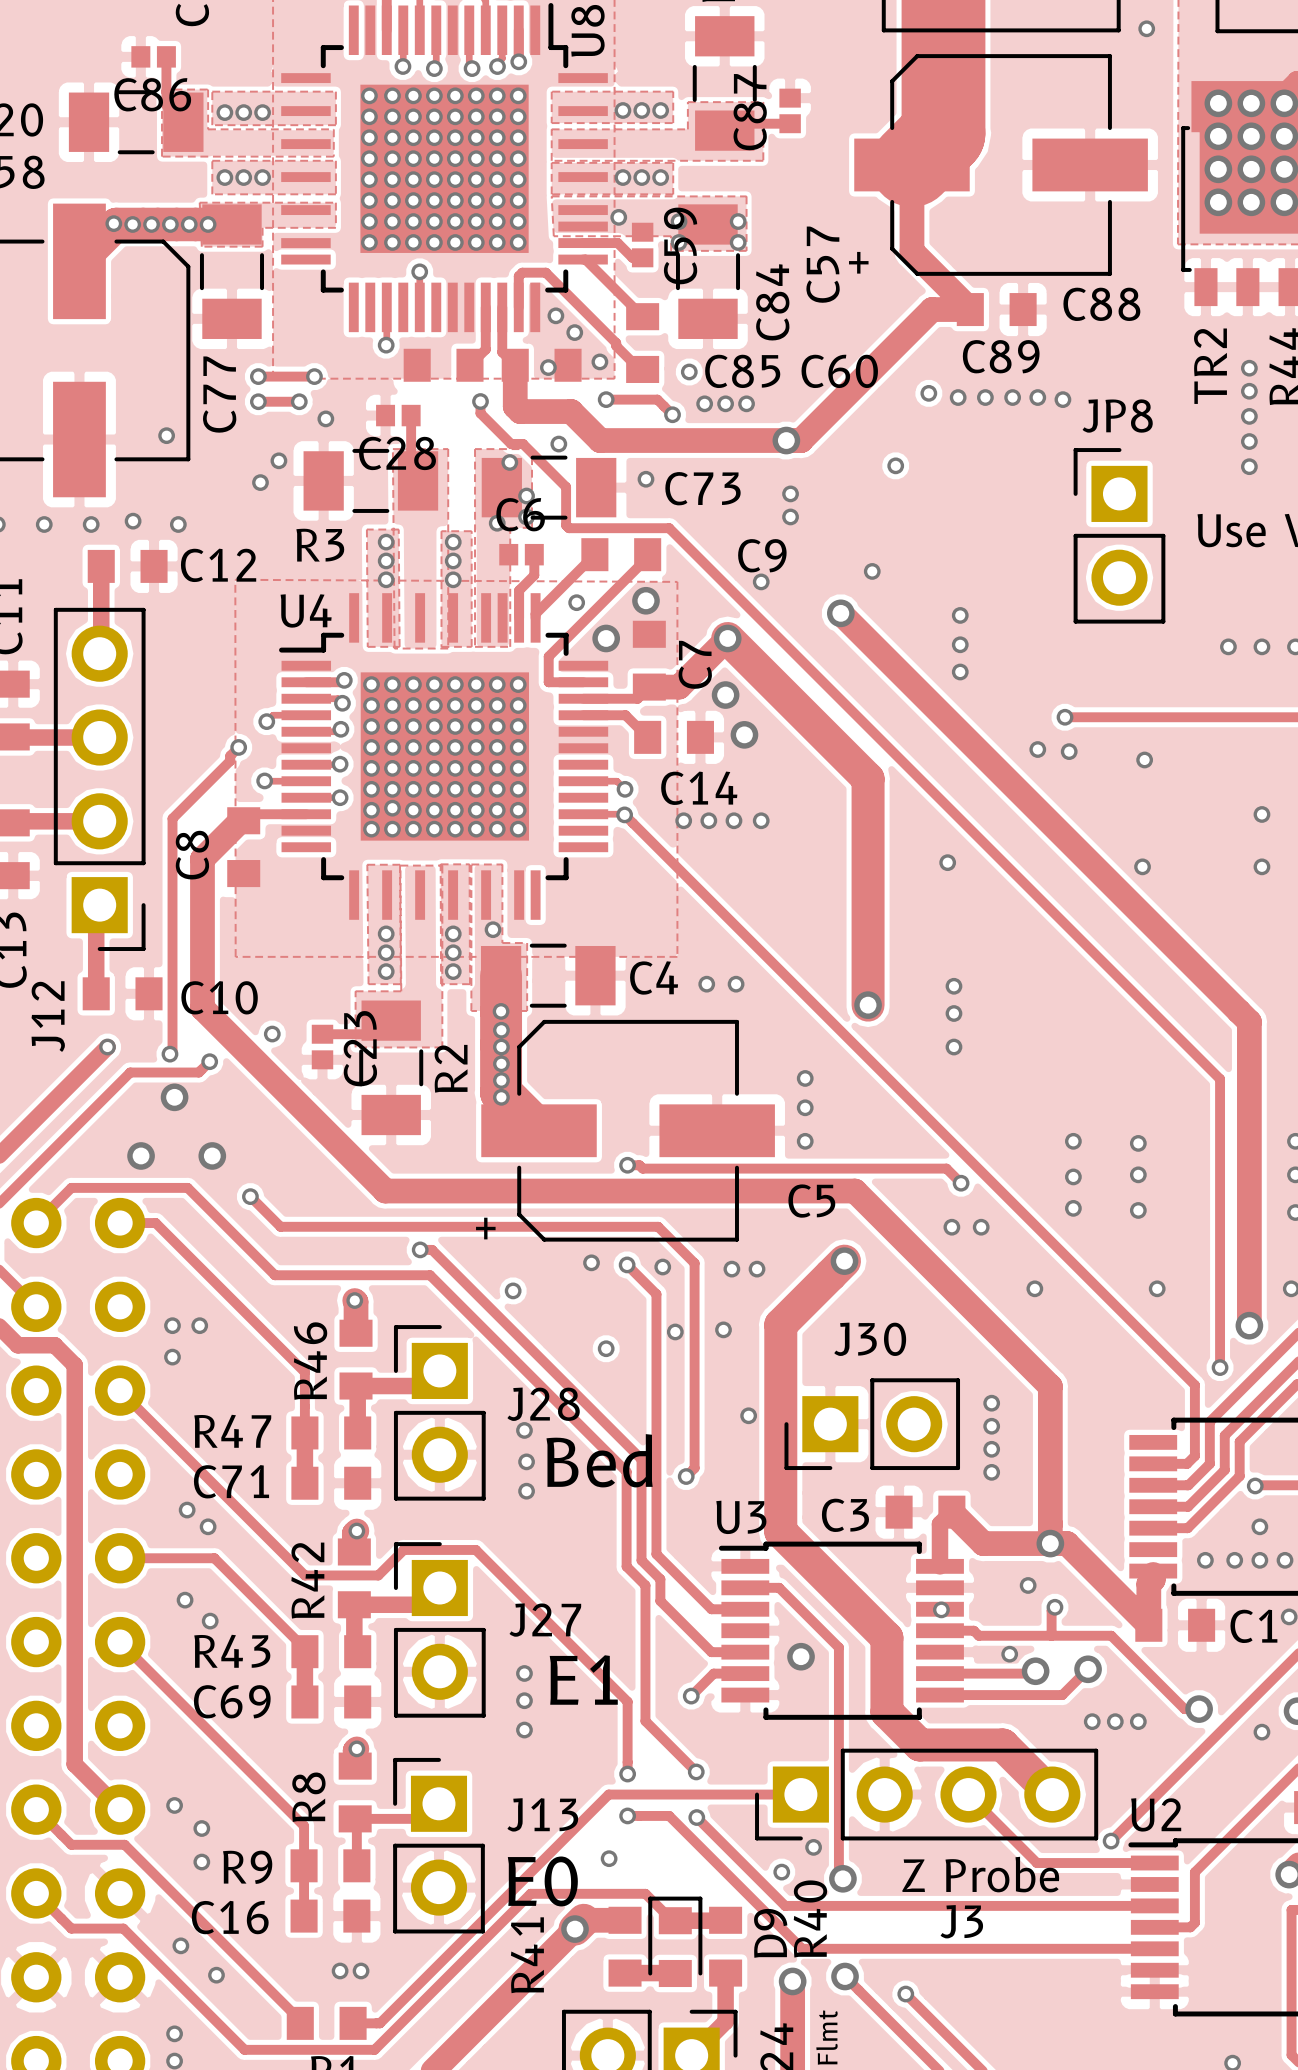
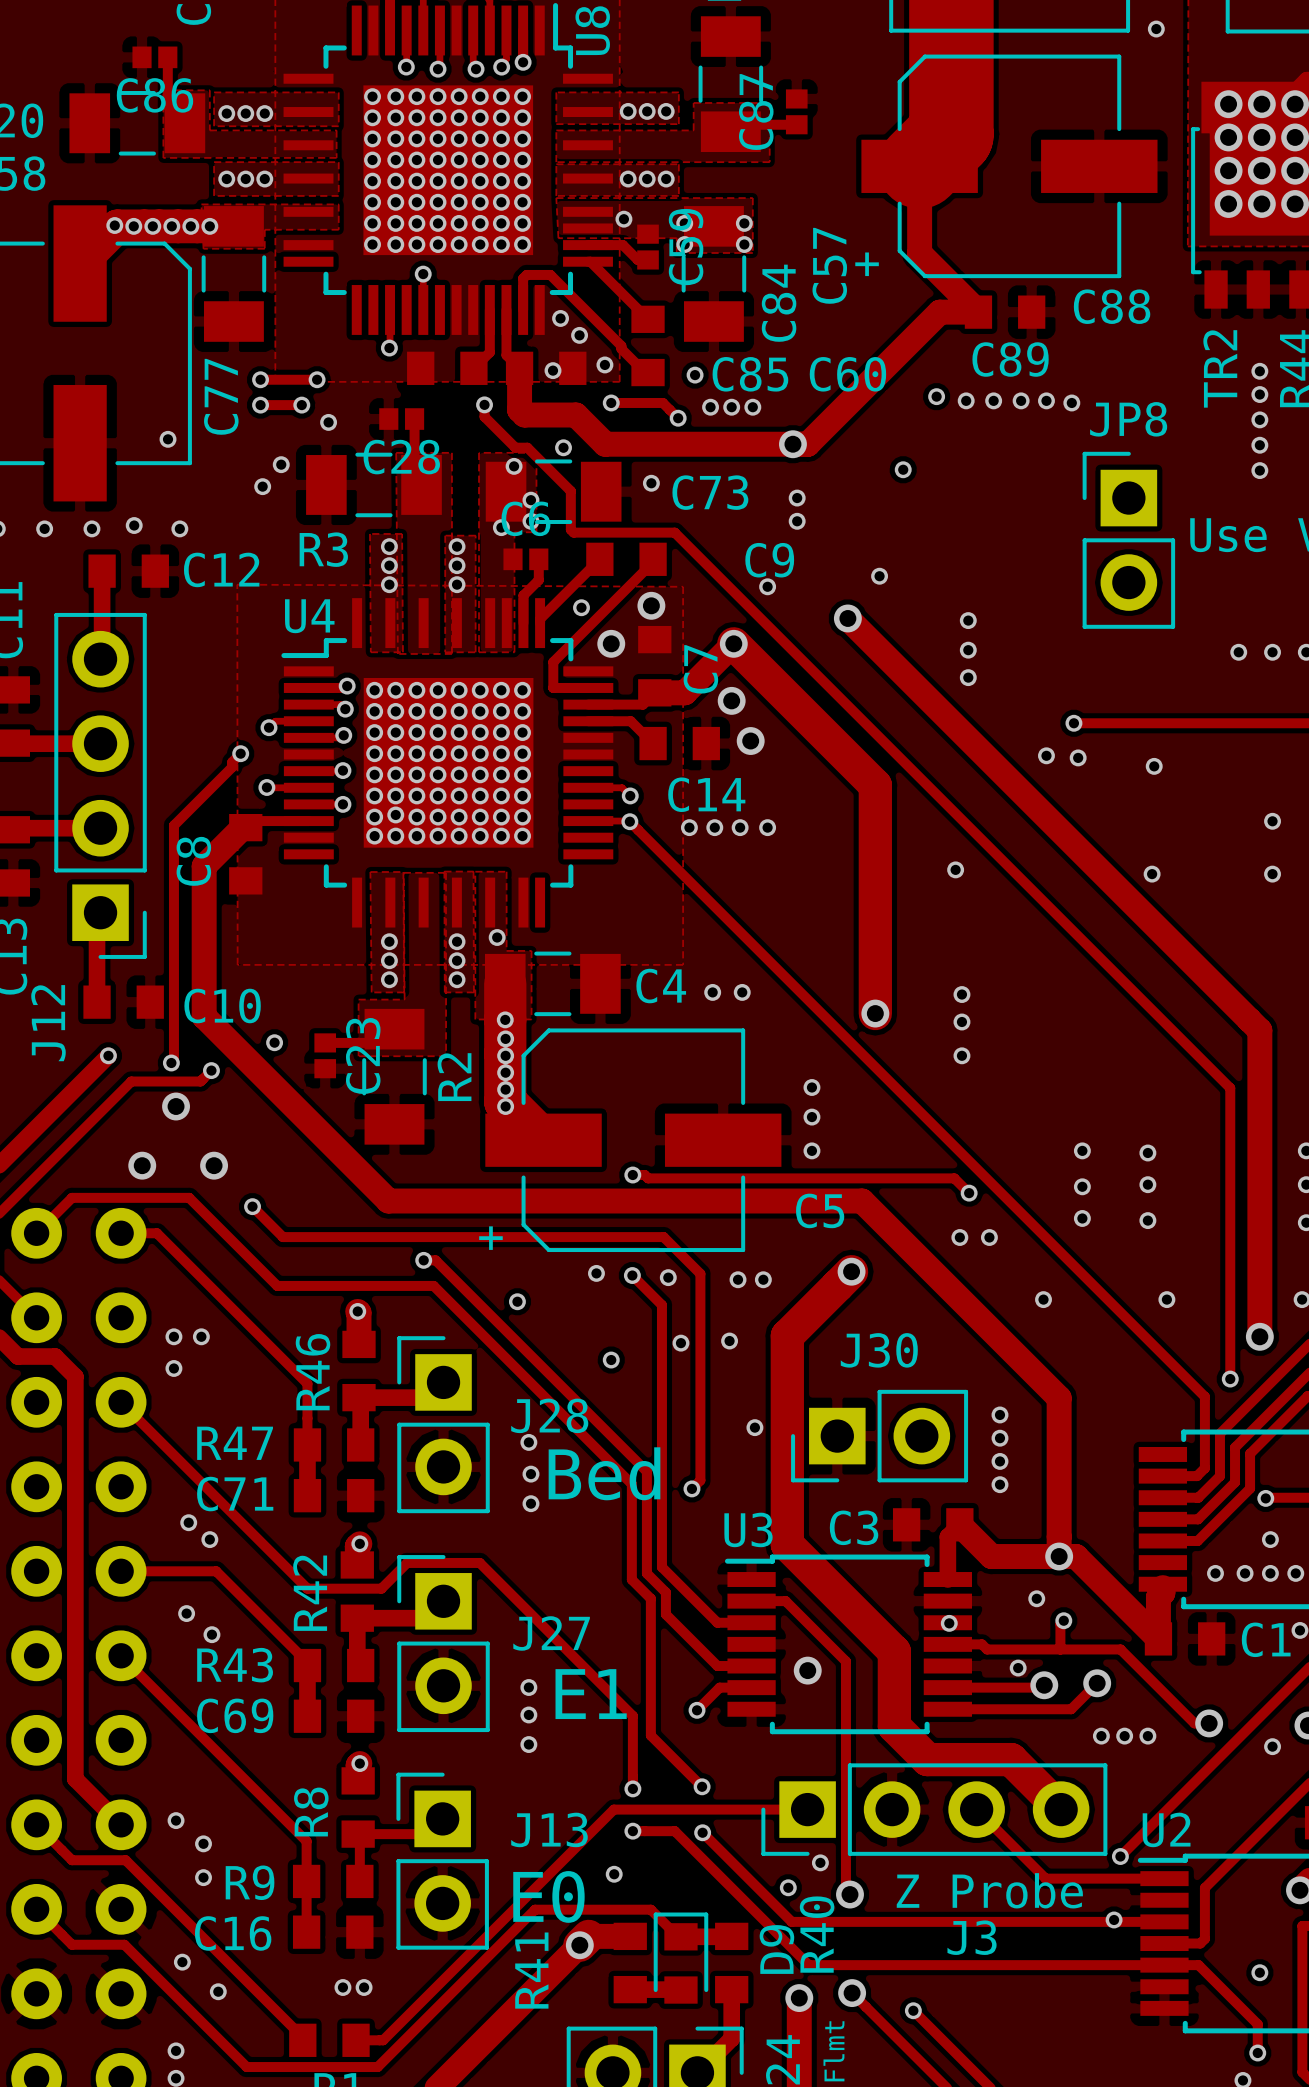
via: none -> (1114, 1919)
track: none -> (1164, 1965) (1198, 1965) (1257, 2024) (1257, 2053)
via: none -> (1259, 1972)
via: none -> (1257, 2053)

